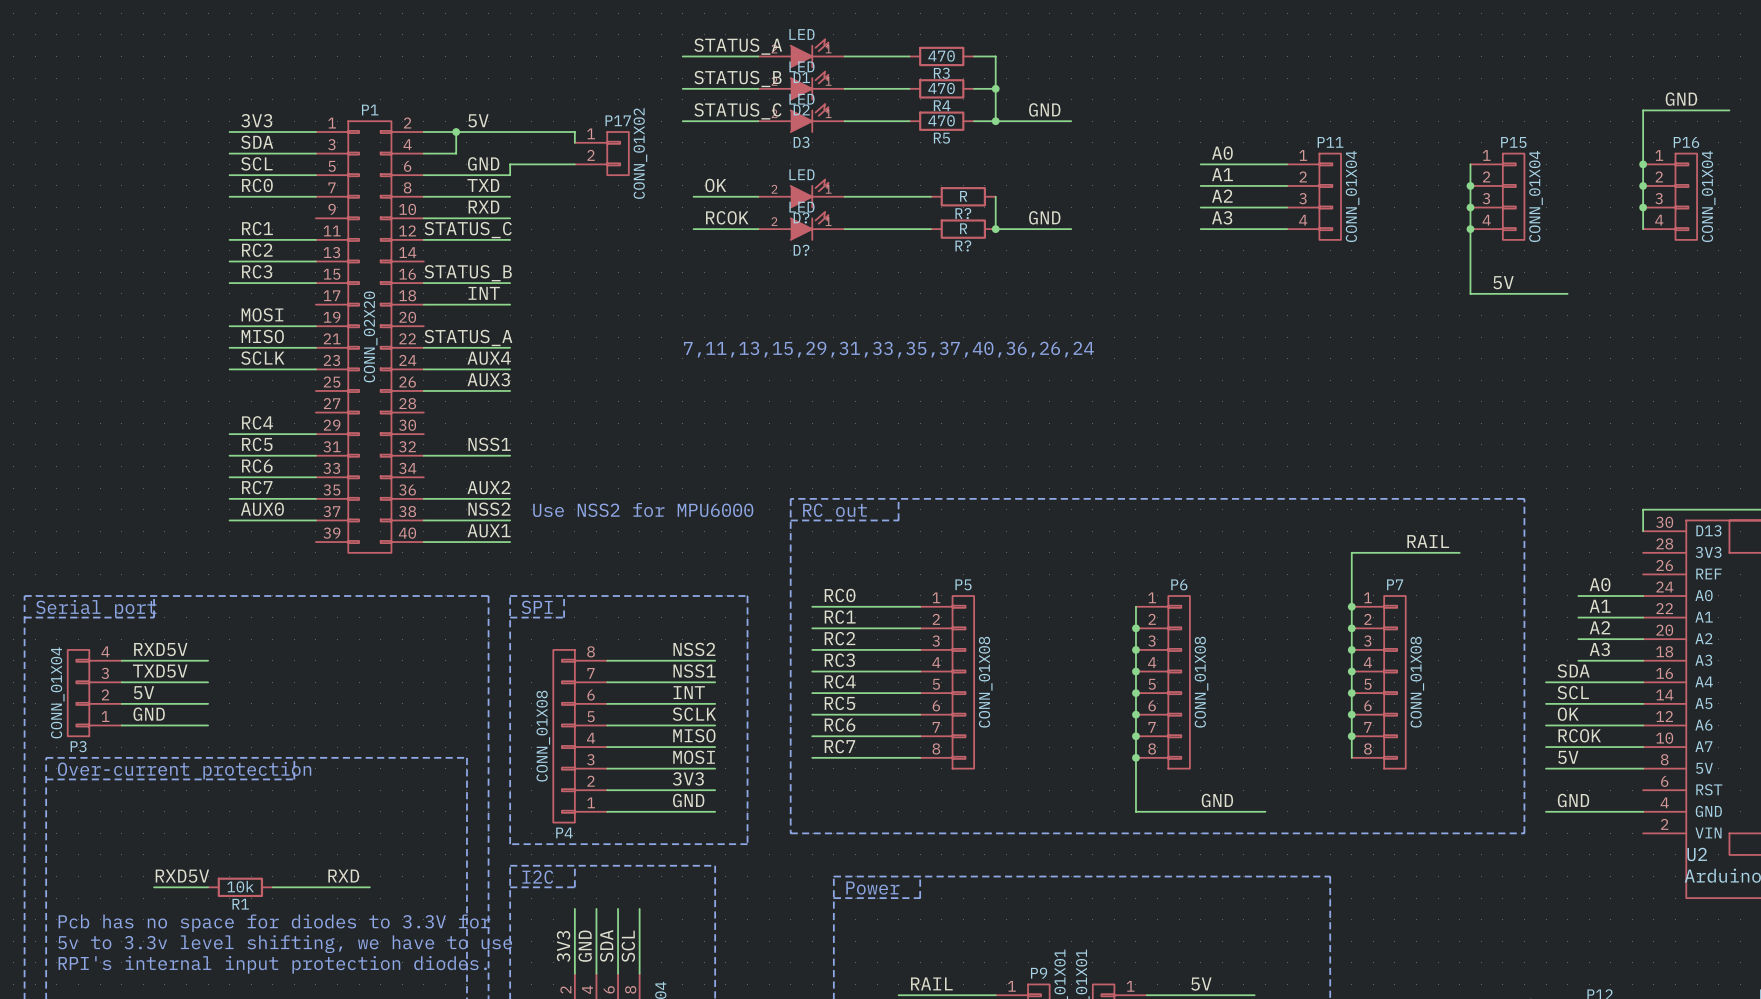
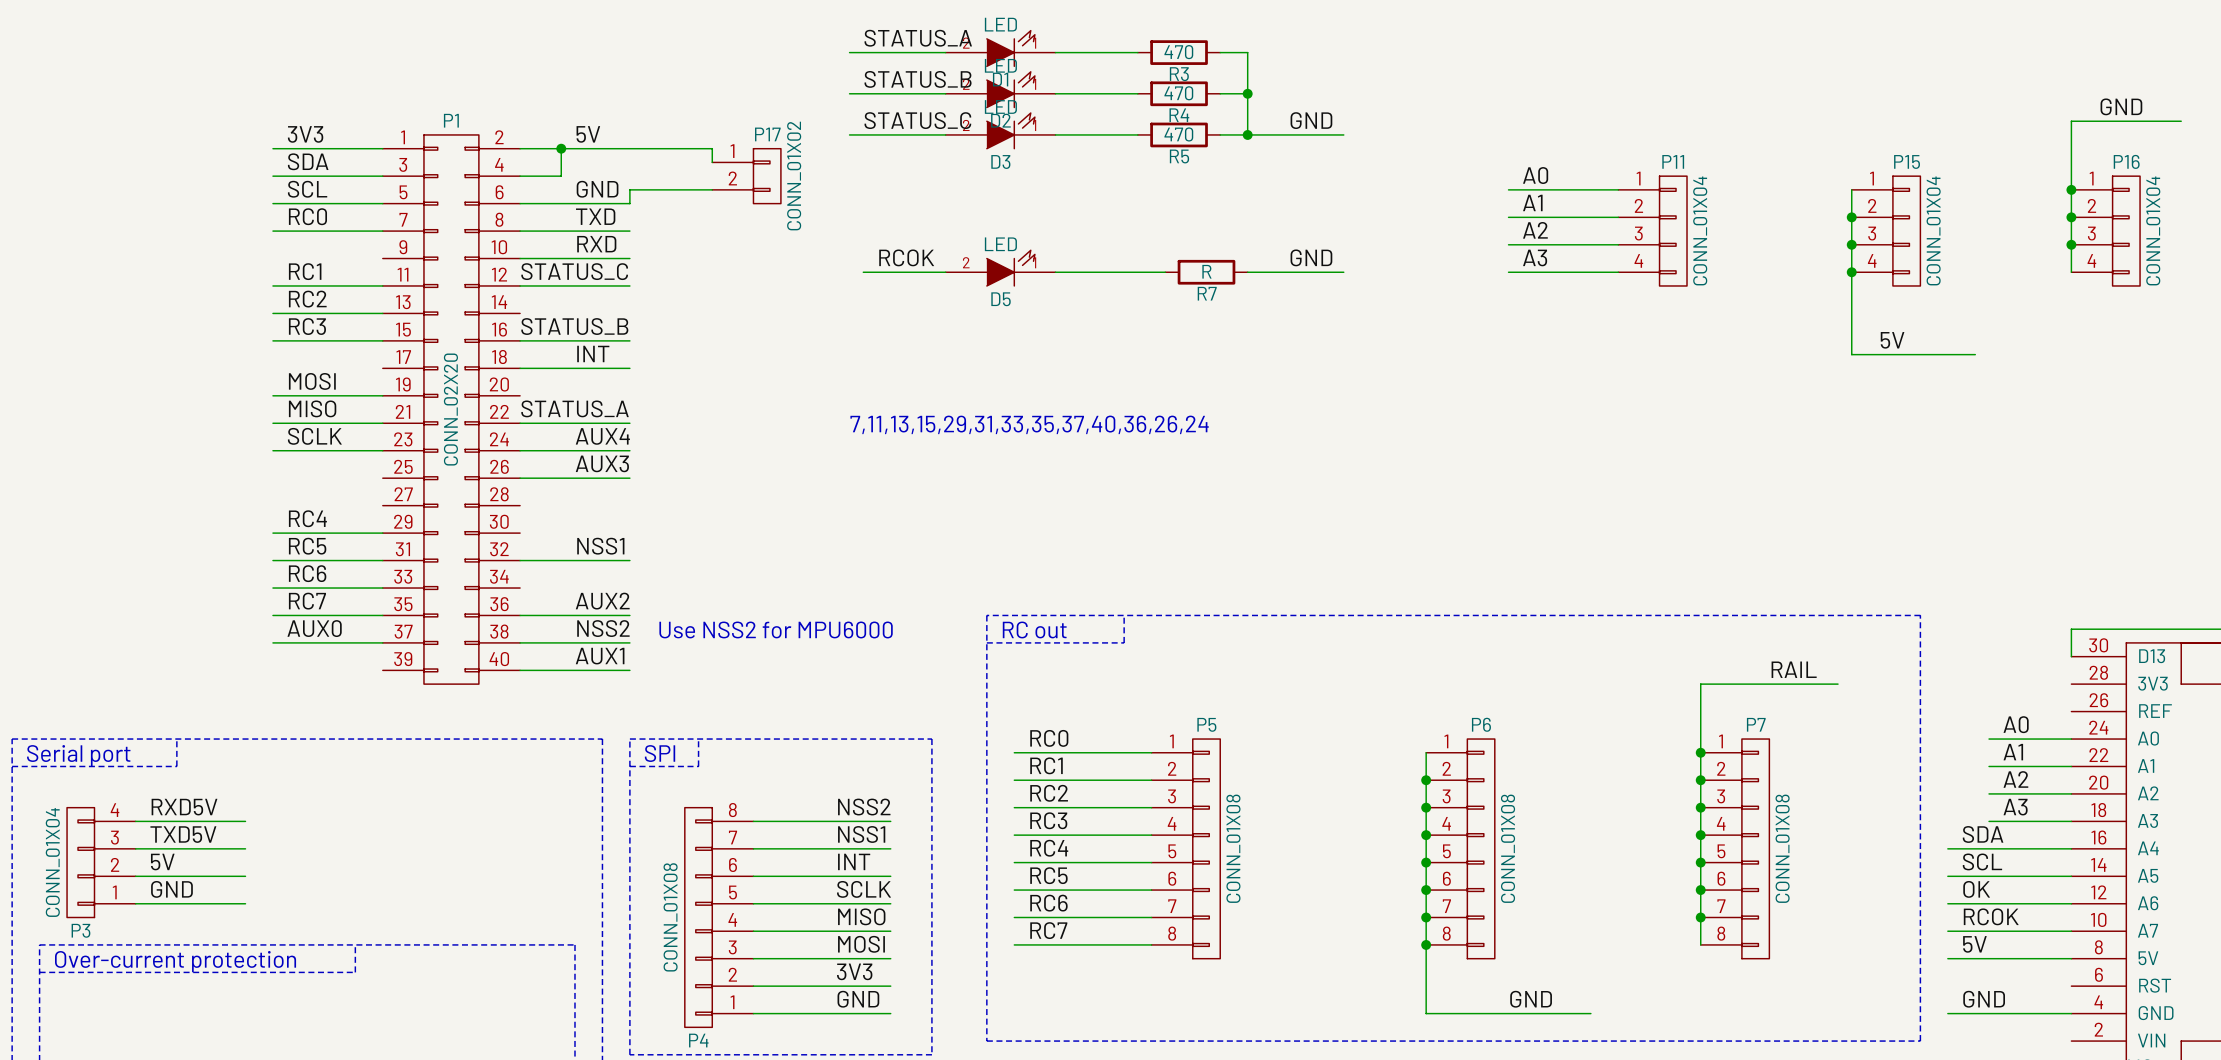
label: OK (715, 185) -> none
D?: LED (801, 193) -> none
wire: (693, 196) (758, 196) -> none
wire: (844, 196) (930, 196) -> none
R?: R (963, 196) -> none
wire: (995, 196) (995, 229) -> none
junction: (995, 229) -> none
R? name: R? (963, 245) -> R7 (1207, 293)
D? name: D? (801, 250) -> D5 (1001, 299)

